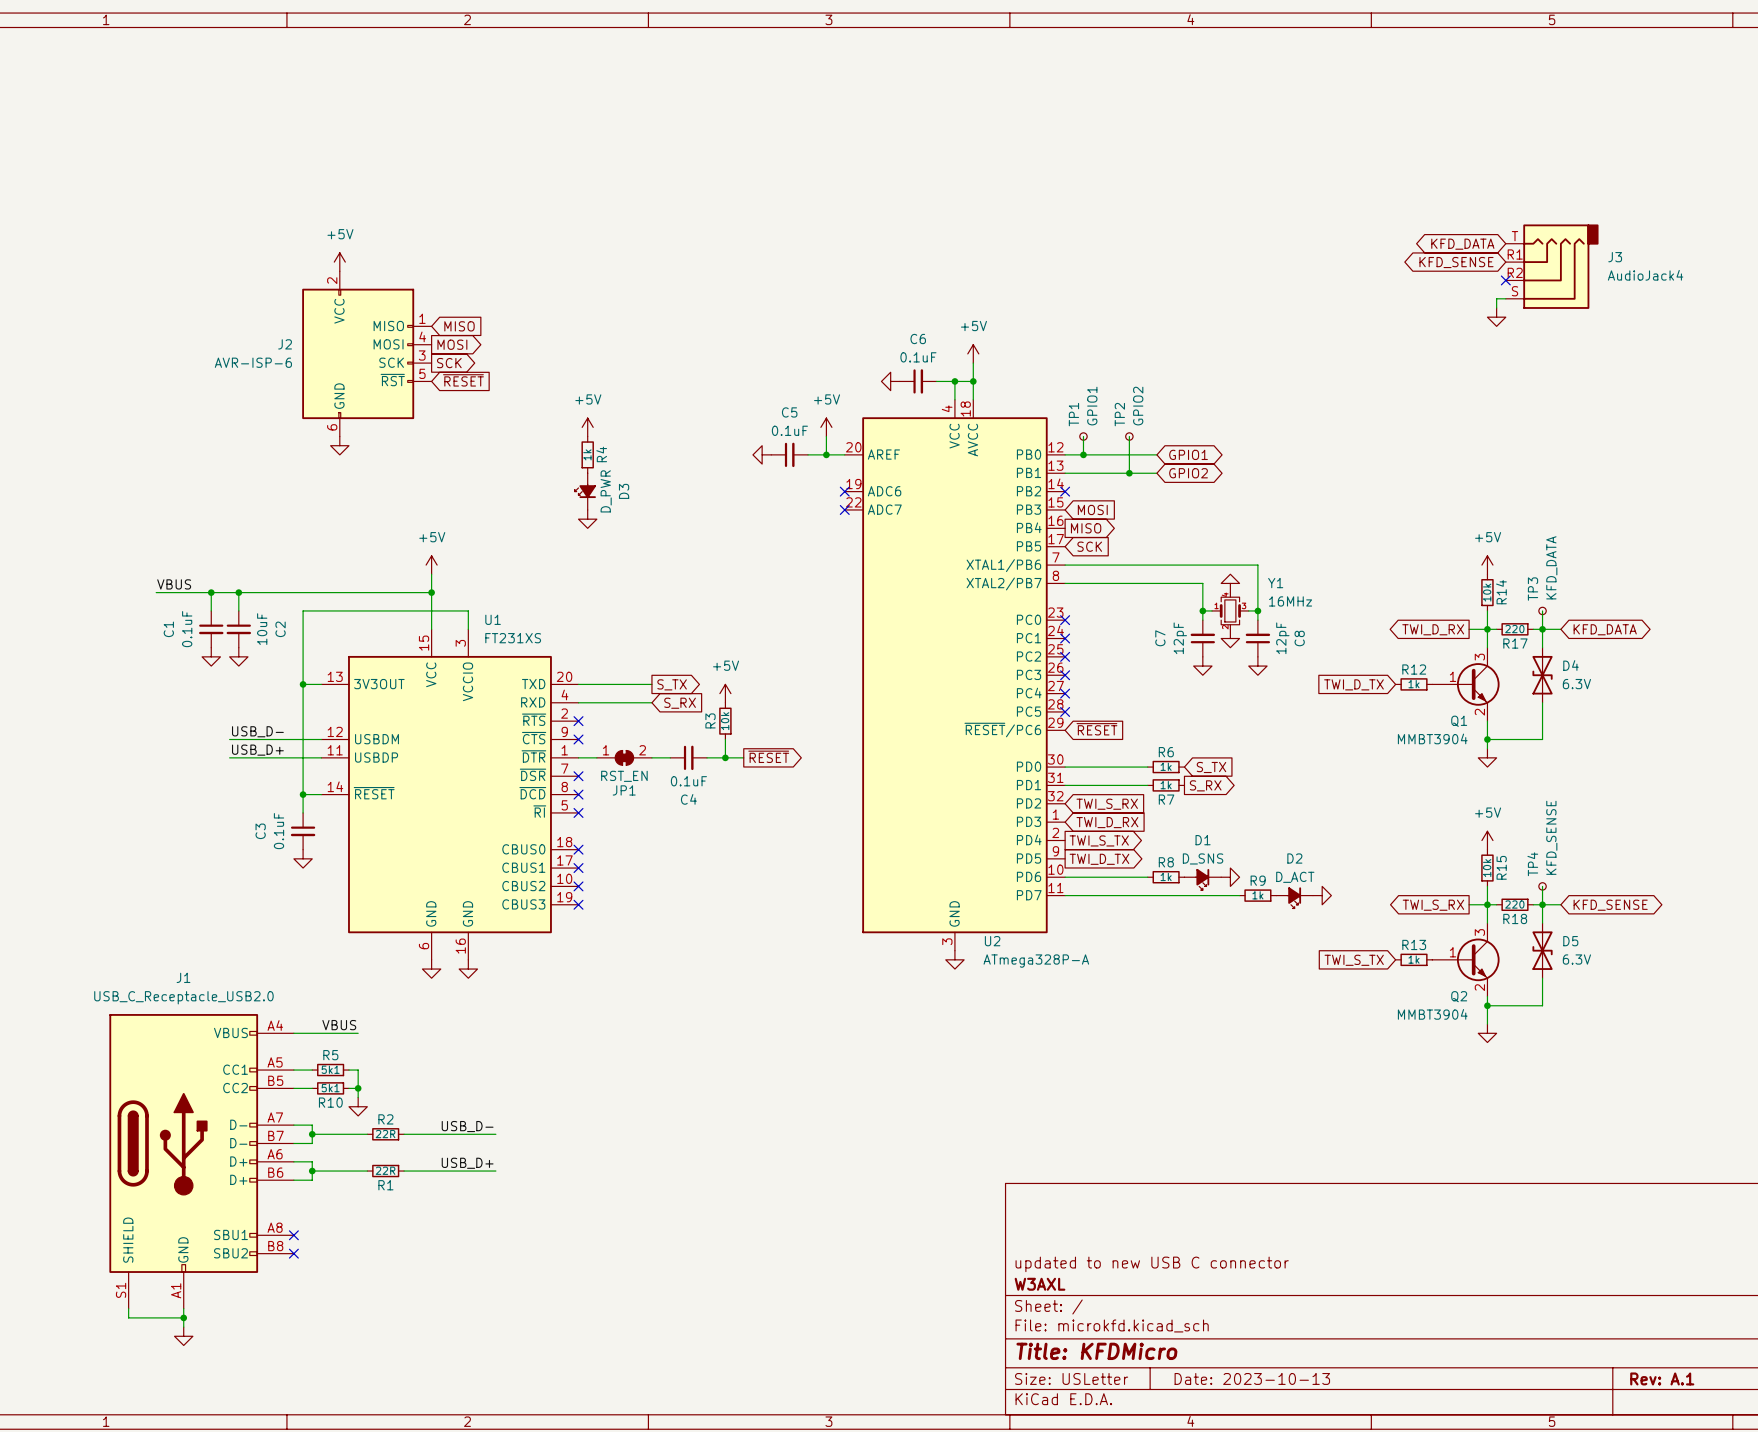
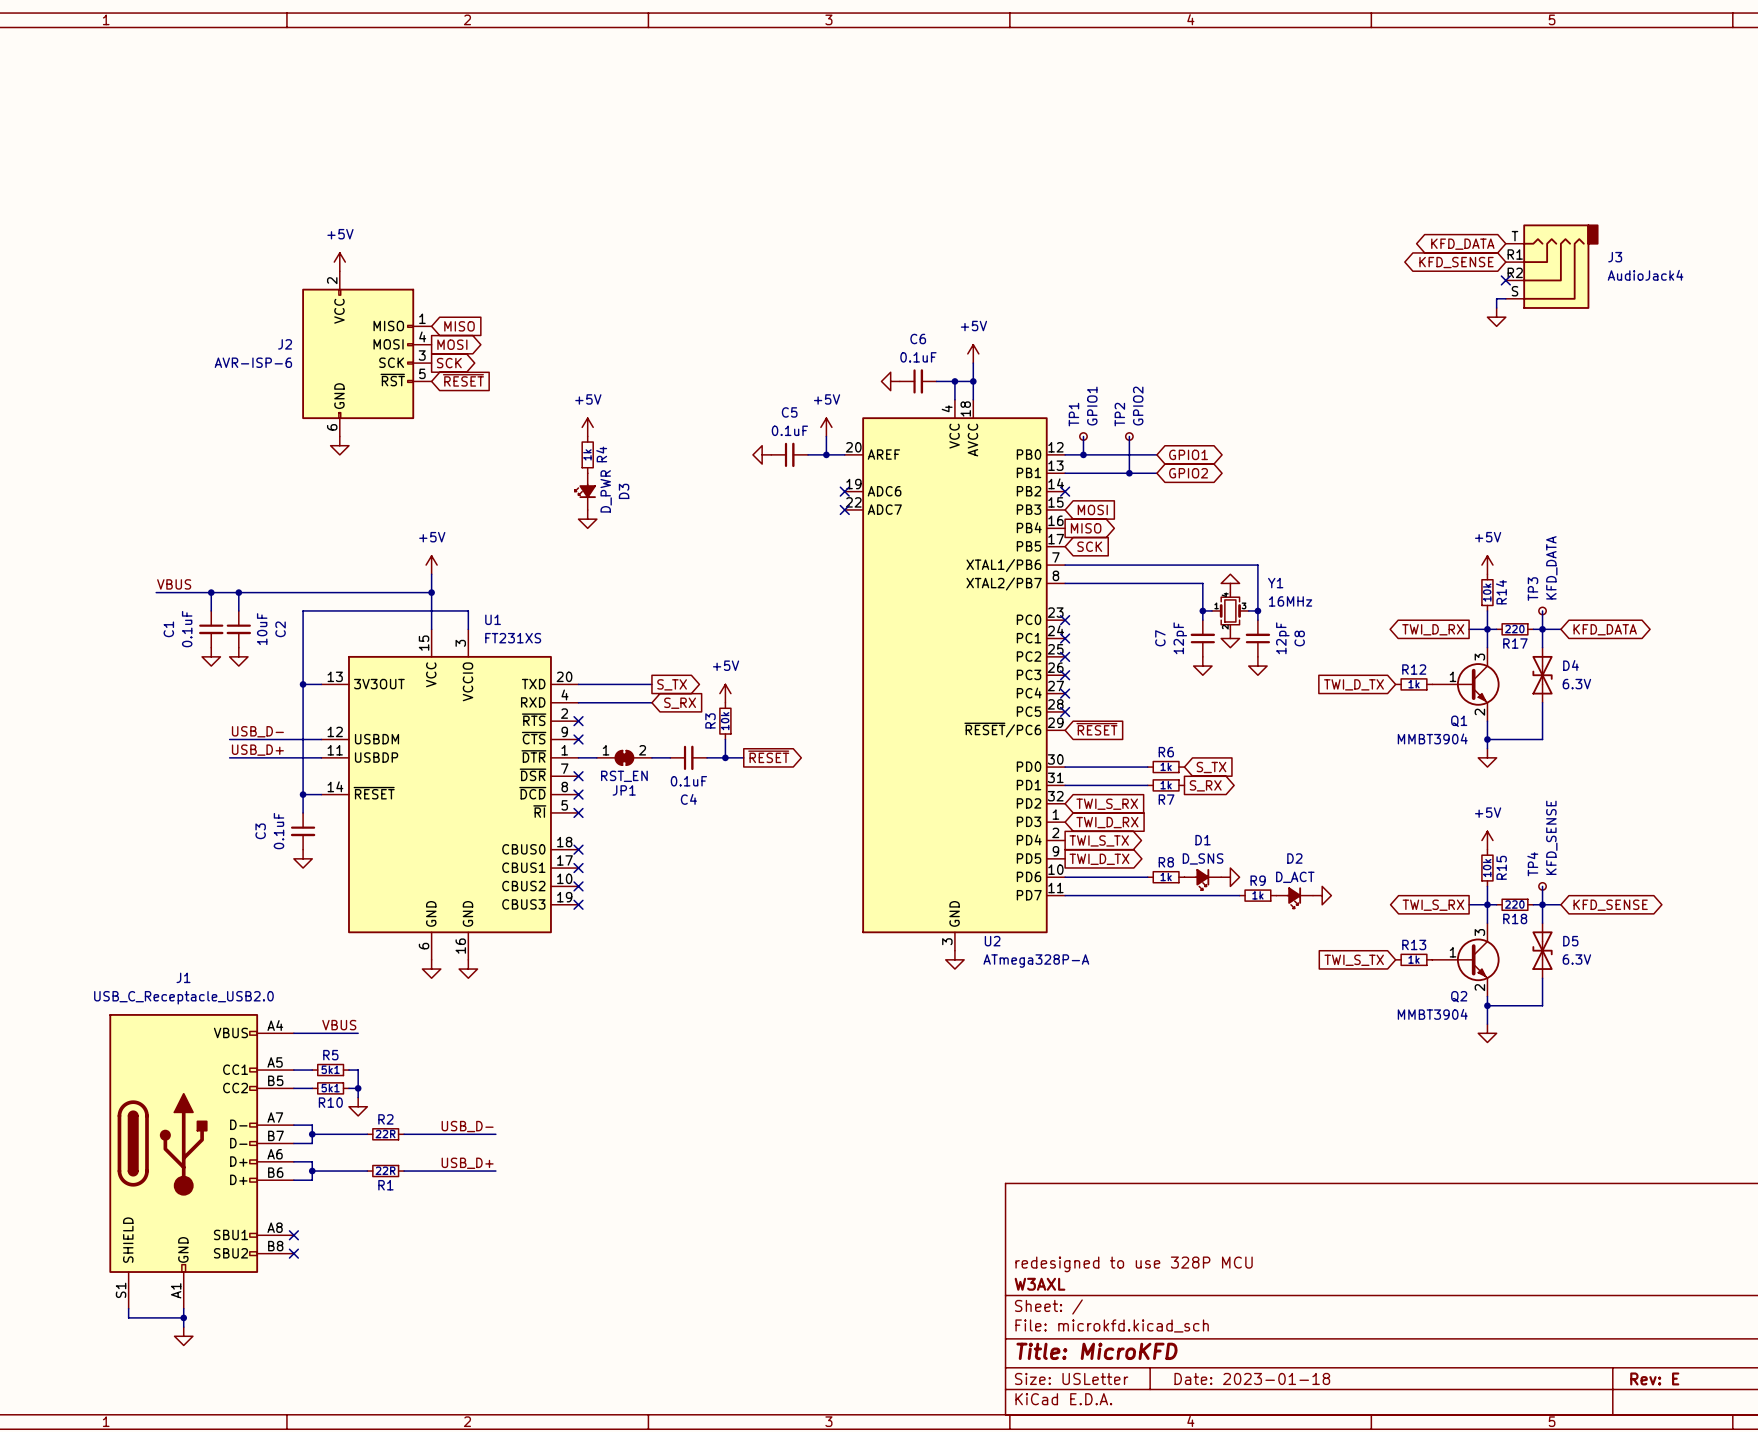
title block: updated to new USB C connector (1152, 1264) -> redesigned to use 328P MCU (1134, 1264)
title block: Title: KFDMicro (1096, 1351) -> Title: MicroKFD (1096, 1351)
title block: Date: 2023-10-13 (1252, 1378) -> Date: 2023-01-18 (1252, 1378)
title block: Rev: A.1 (1662, 1378) -> Rev: E (1654, 1378)

